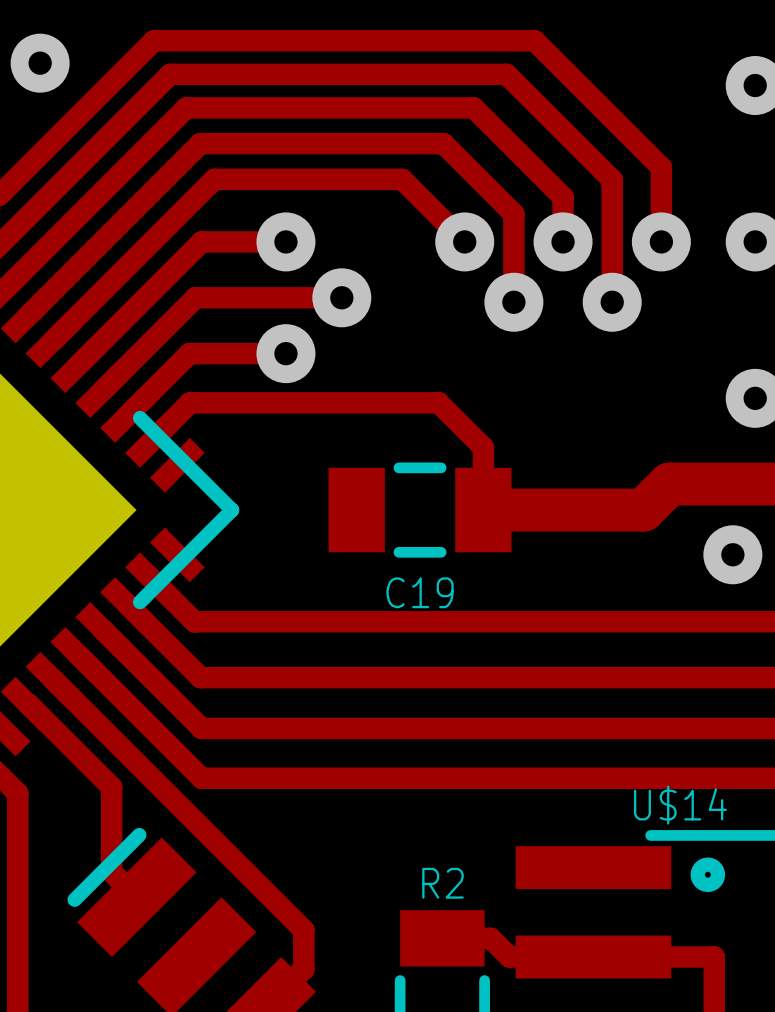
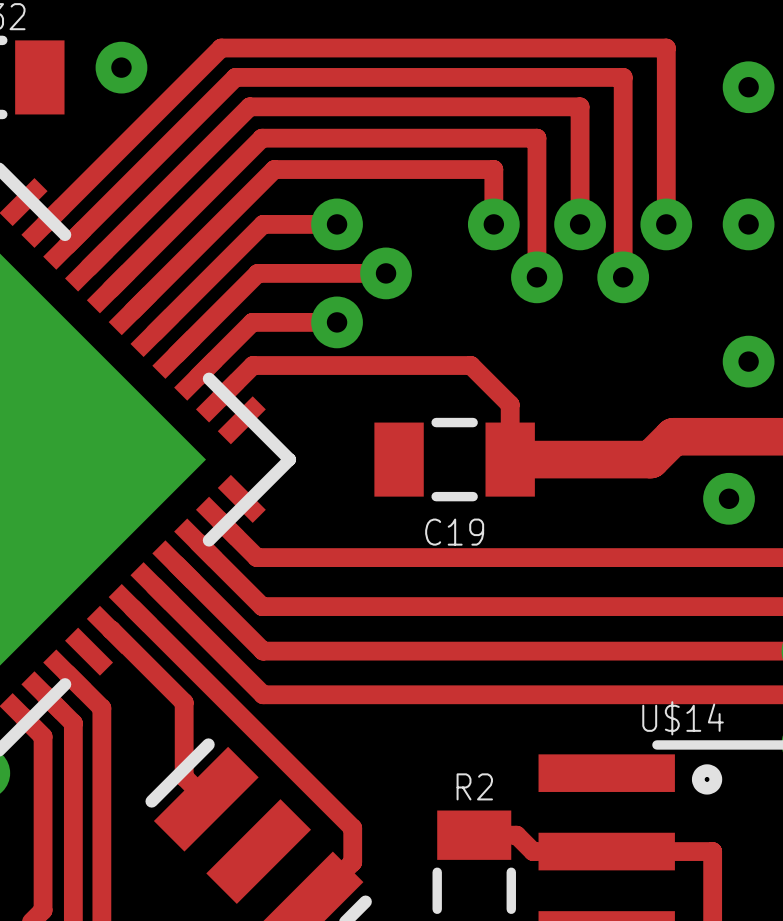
track: (534, 40) (661, 167) -> (555, 48) (666, 48) (666, 159)
track: (506, 74) (612, 179) -> (530, 77) (623, 77) (623, 170)
track: (473, 107) (563, 197) -> (501, 106) (580, 106) (580, 185)
track: (443, 143) (513, 213) -> (475, 138) (536, 138) (536, 199)
track: (402, 179) (464, 241) -> (438, 169) (493, 169) (493, 224)

